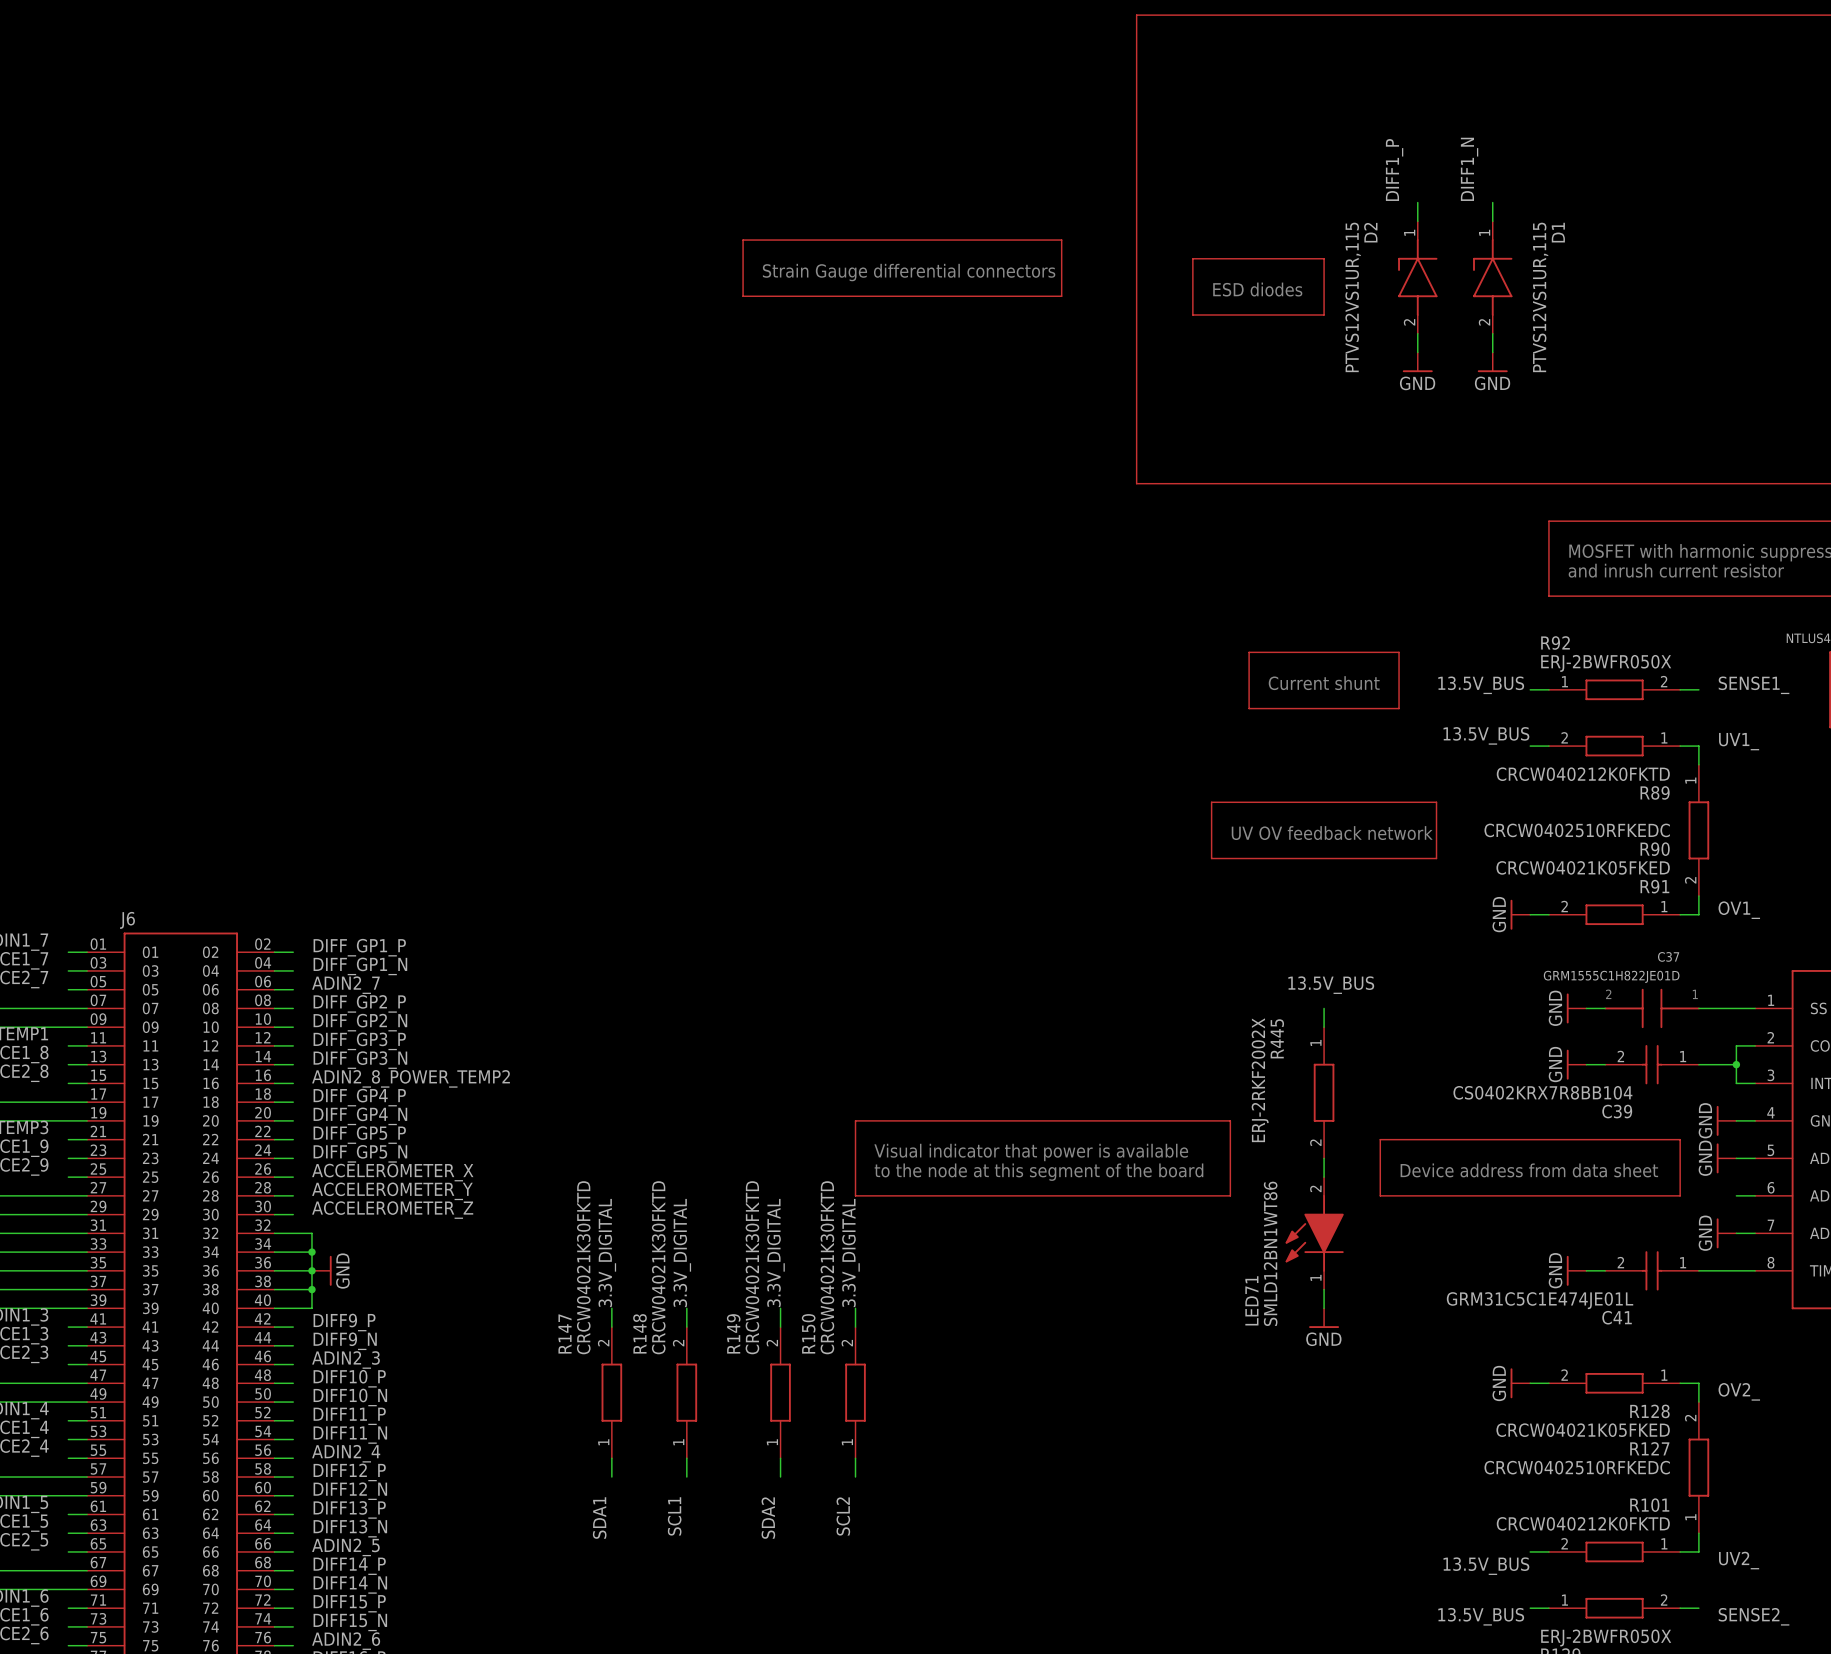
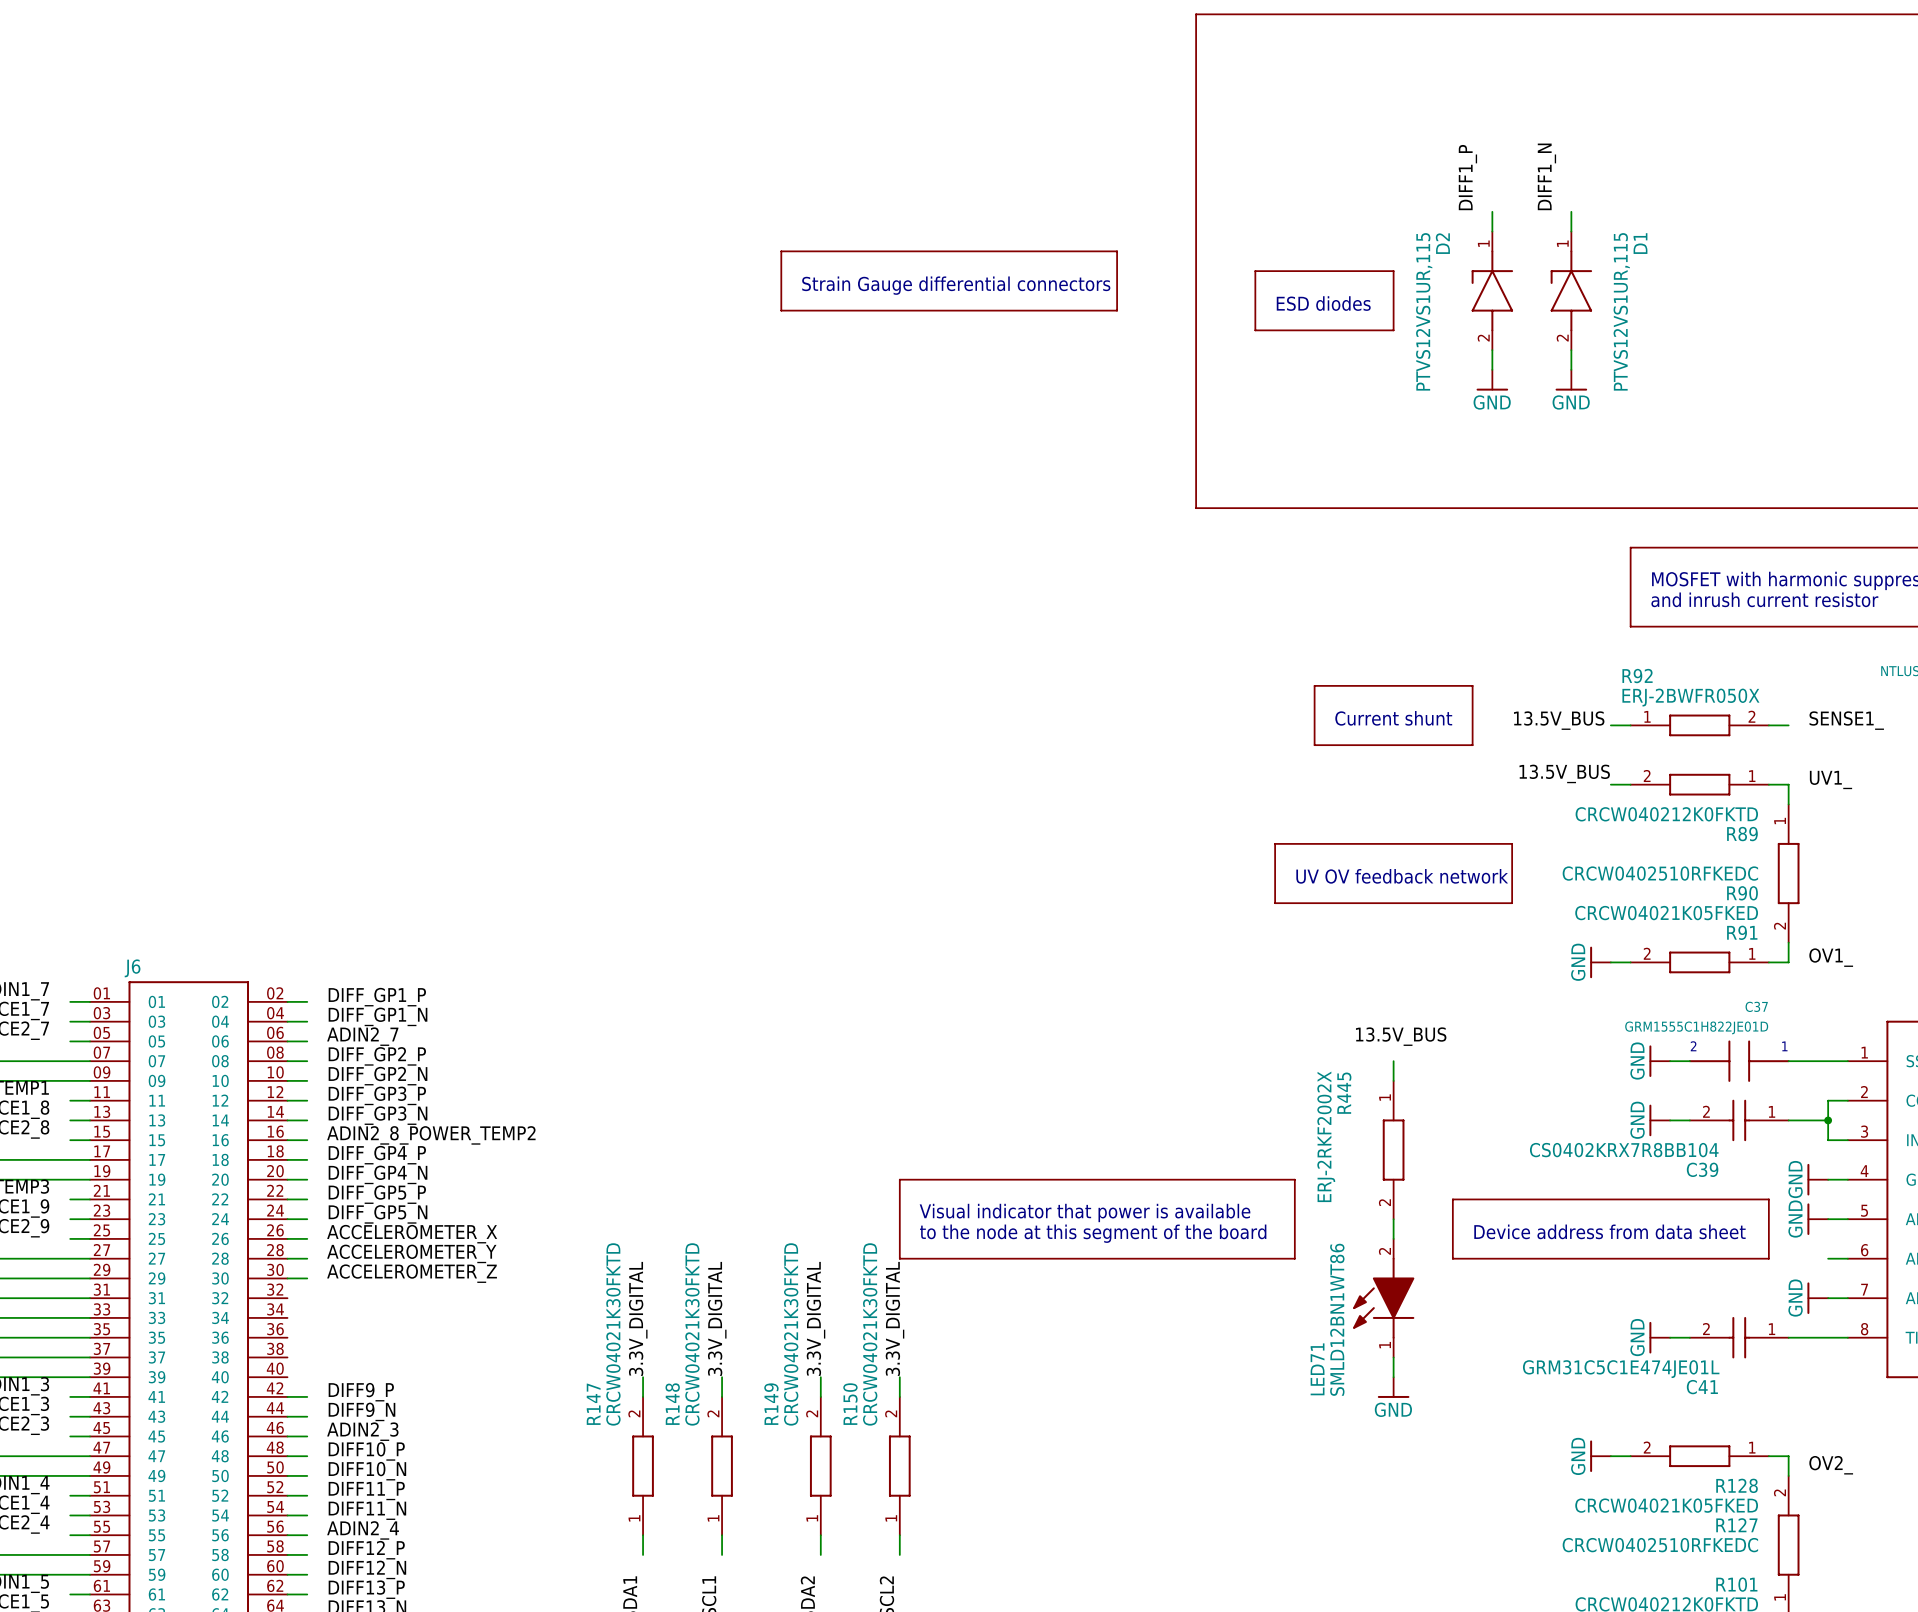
wire: (274, 1233) (311, 1233) (311, 1308) (274, 1308) -> none
wire: (274, 1252) (311, 1252) -> none
junction: (311, 1252) -> none
wire: (274, 1270) (311, 1270) -> none
junction: (311, 1270) -> none
power symbol: GND (321, 1270) -> none
wire: (274, 1289) (311, 1289) -> none
junction: (311, 1289) -> none

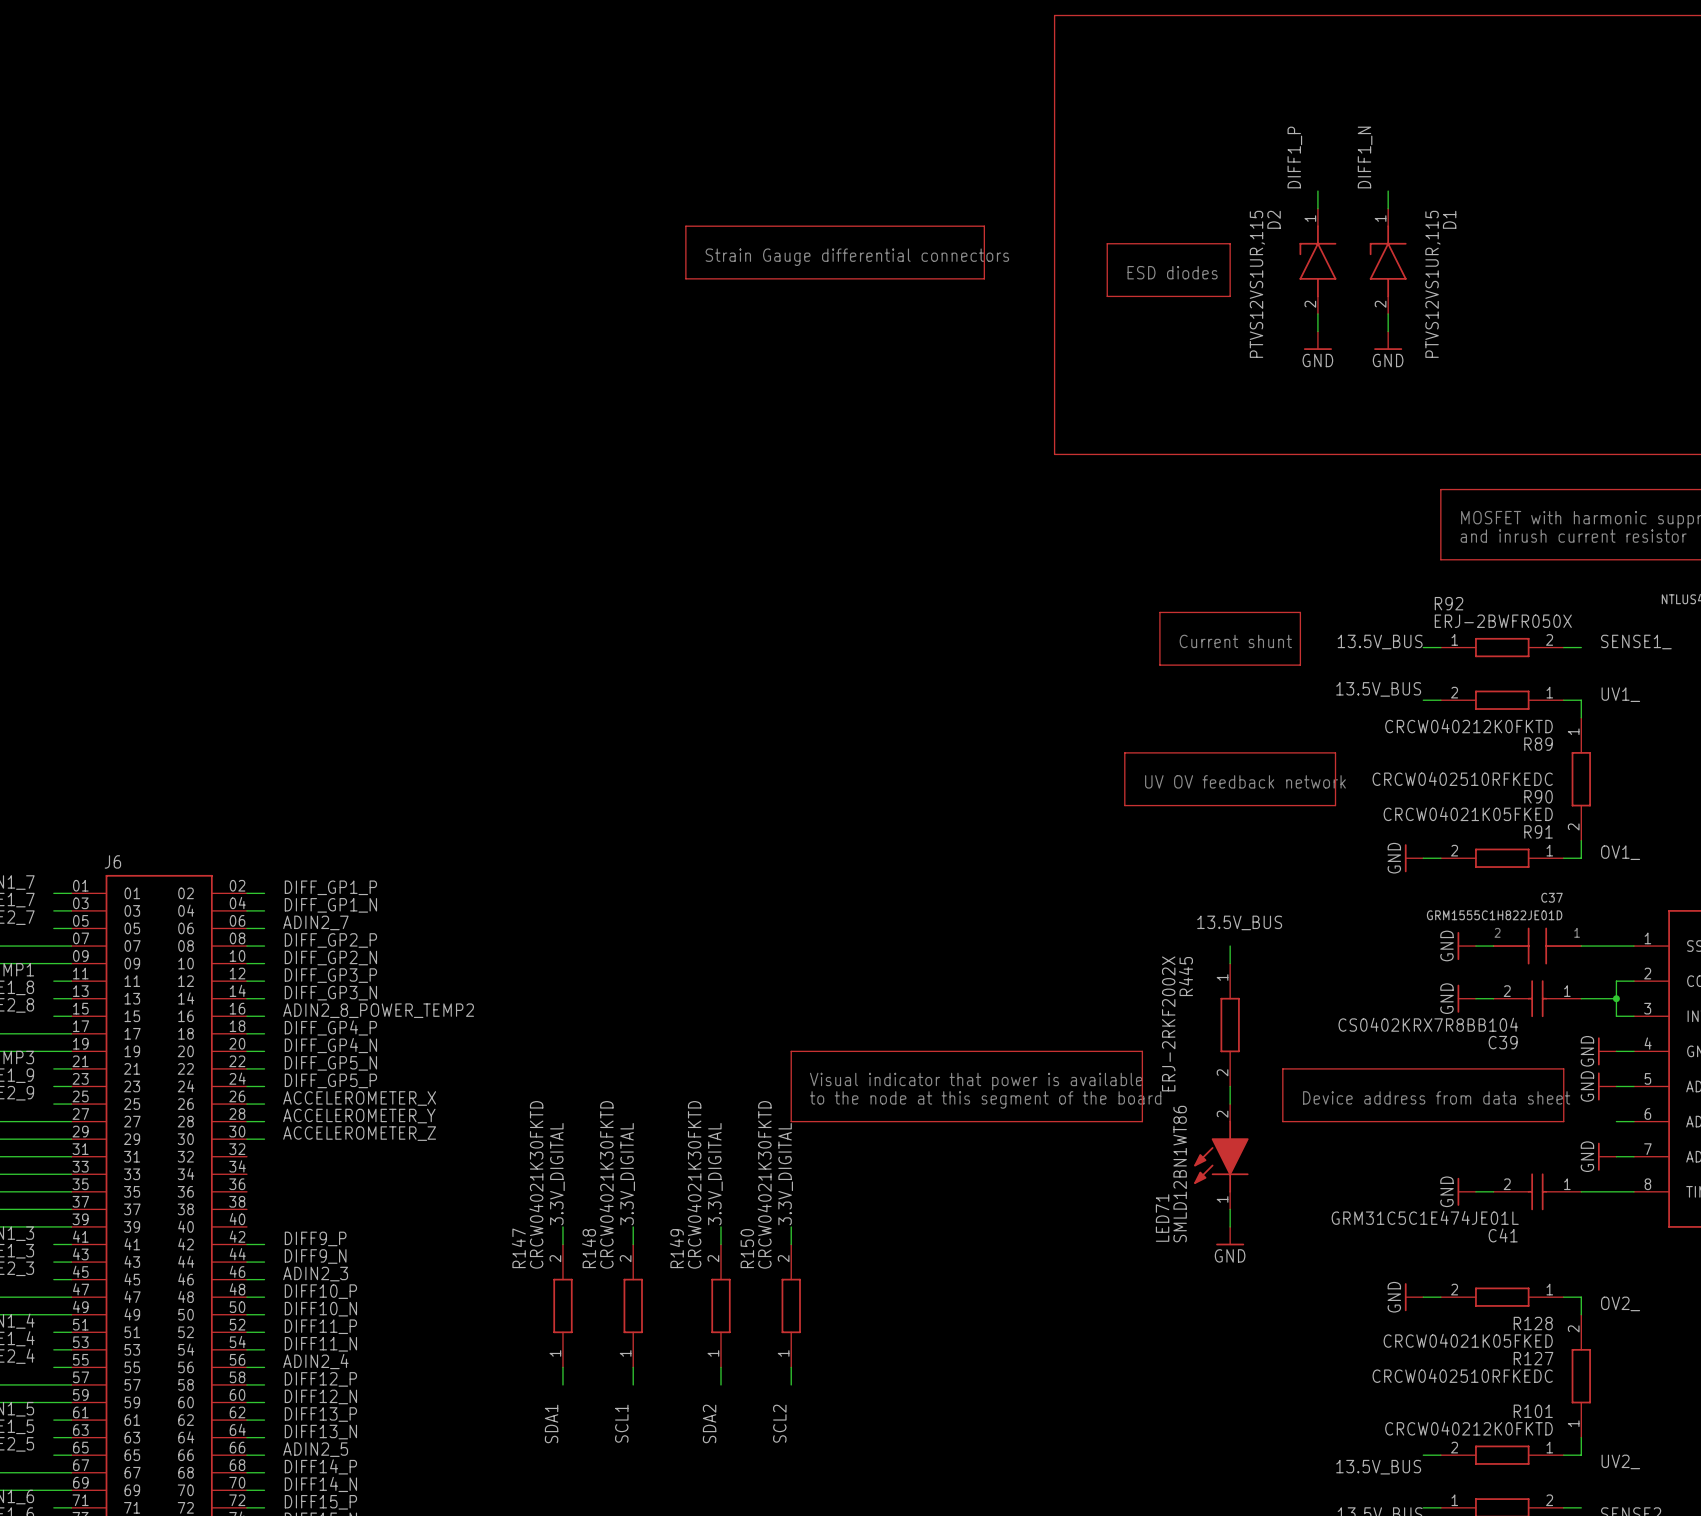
label: DIFF_GP5_P (377, 1194) -> DIFF_GP5_N (330, 1063)
label: DIFF_GP5_N (378, 1214) -> DIFF_GP5_P (330, 1080)

